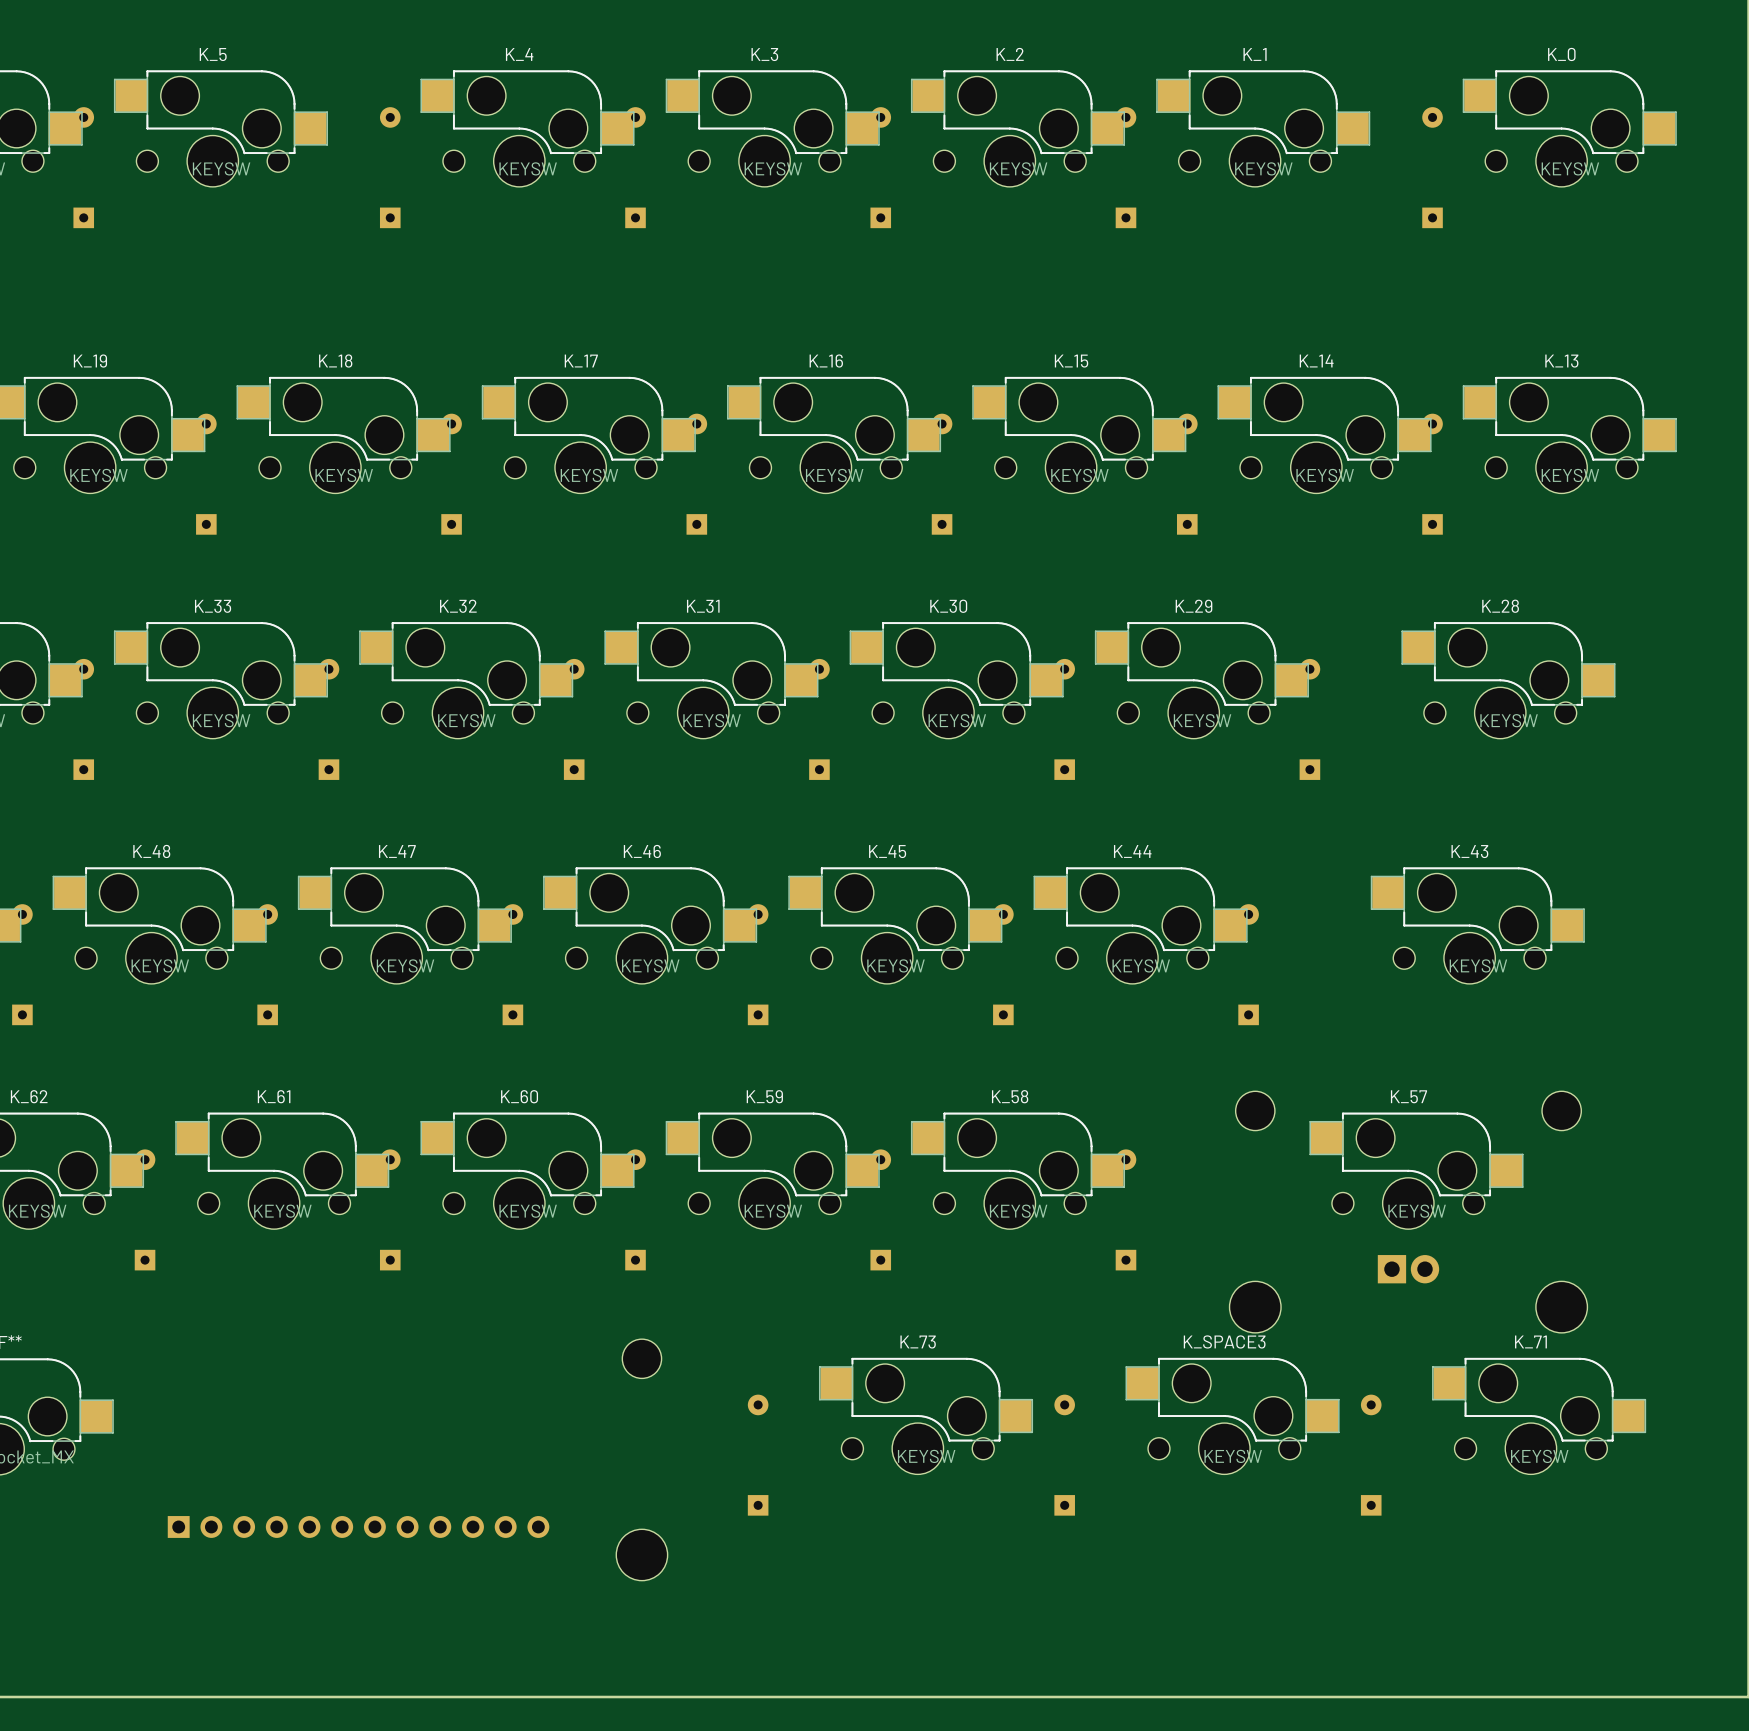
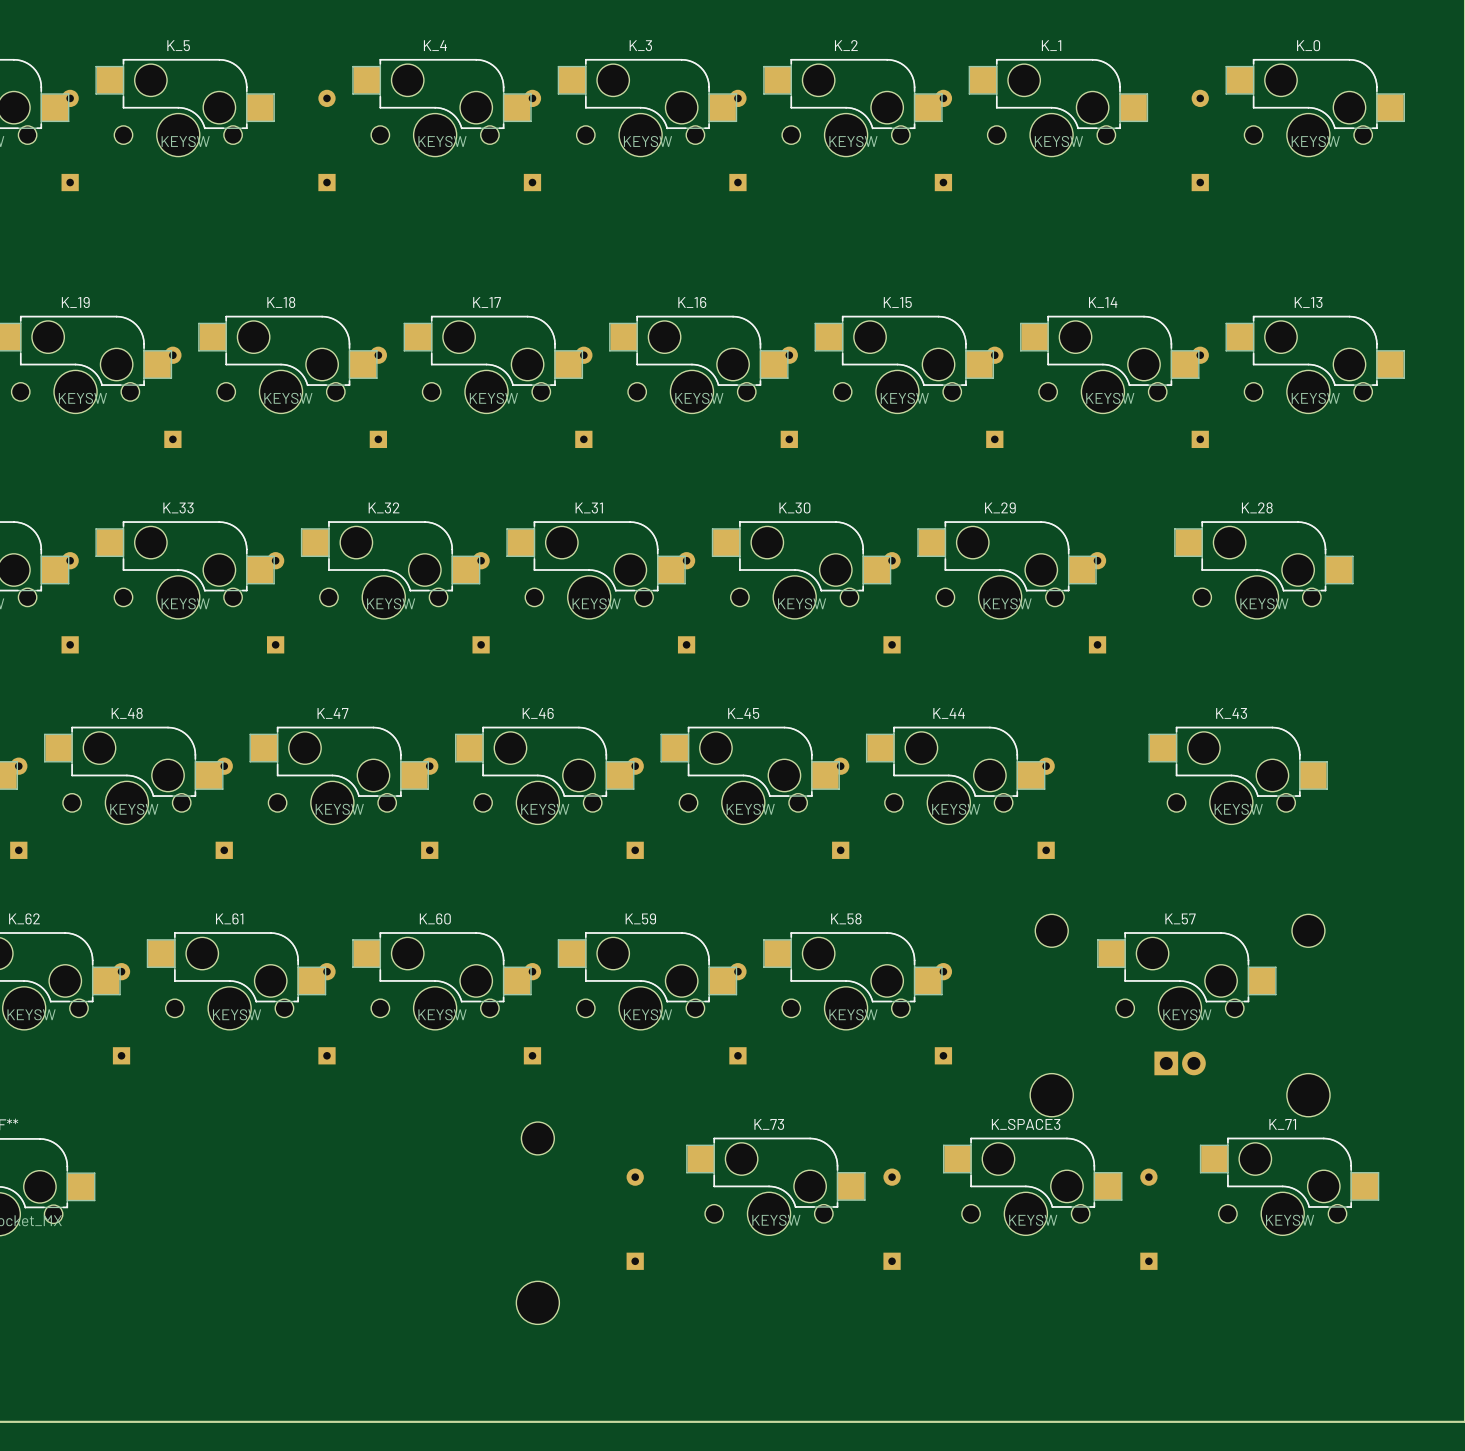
part: (358, 1526) -> none

